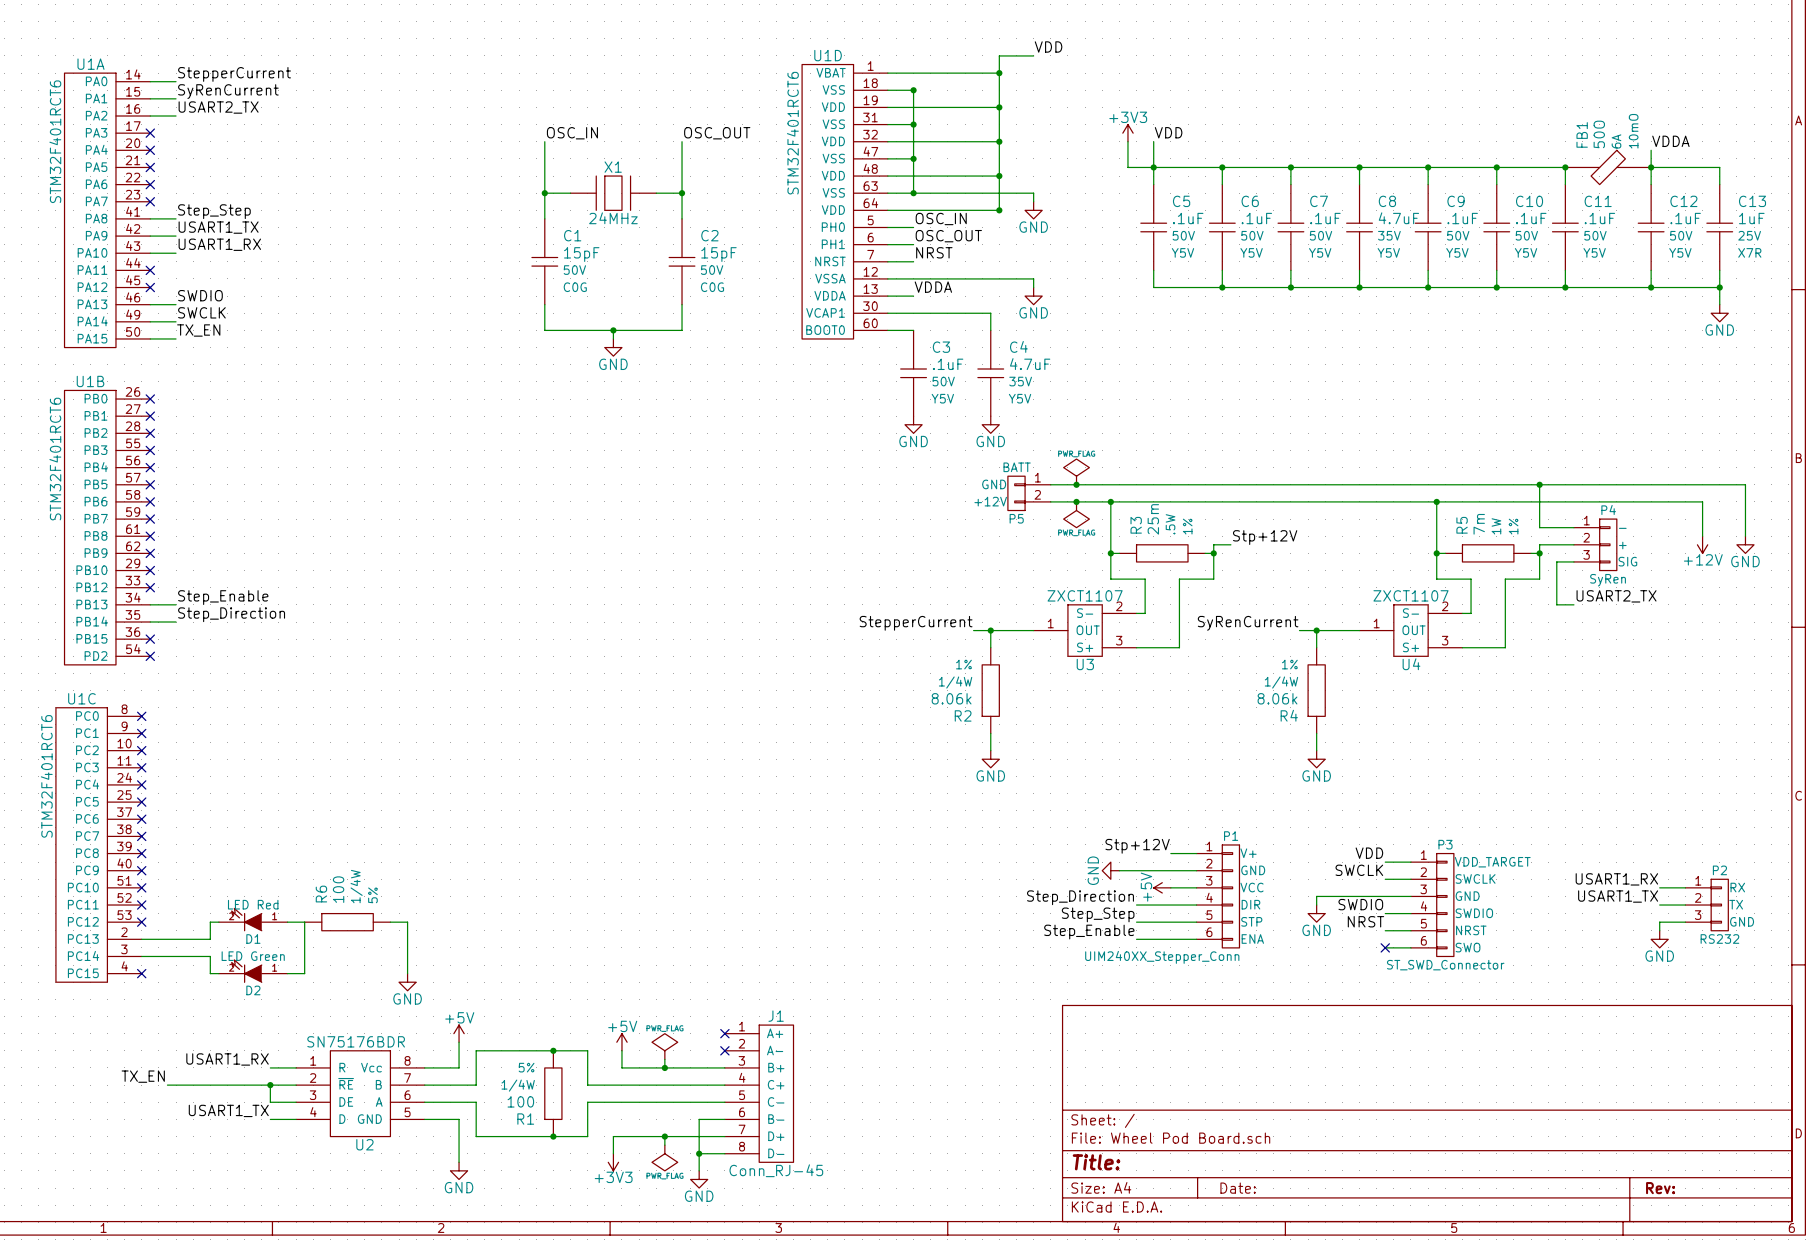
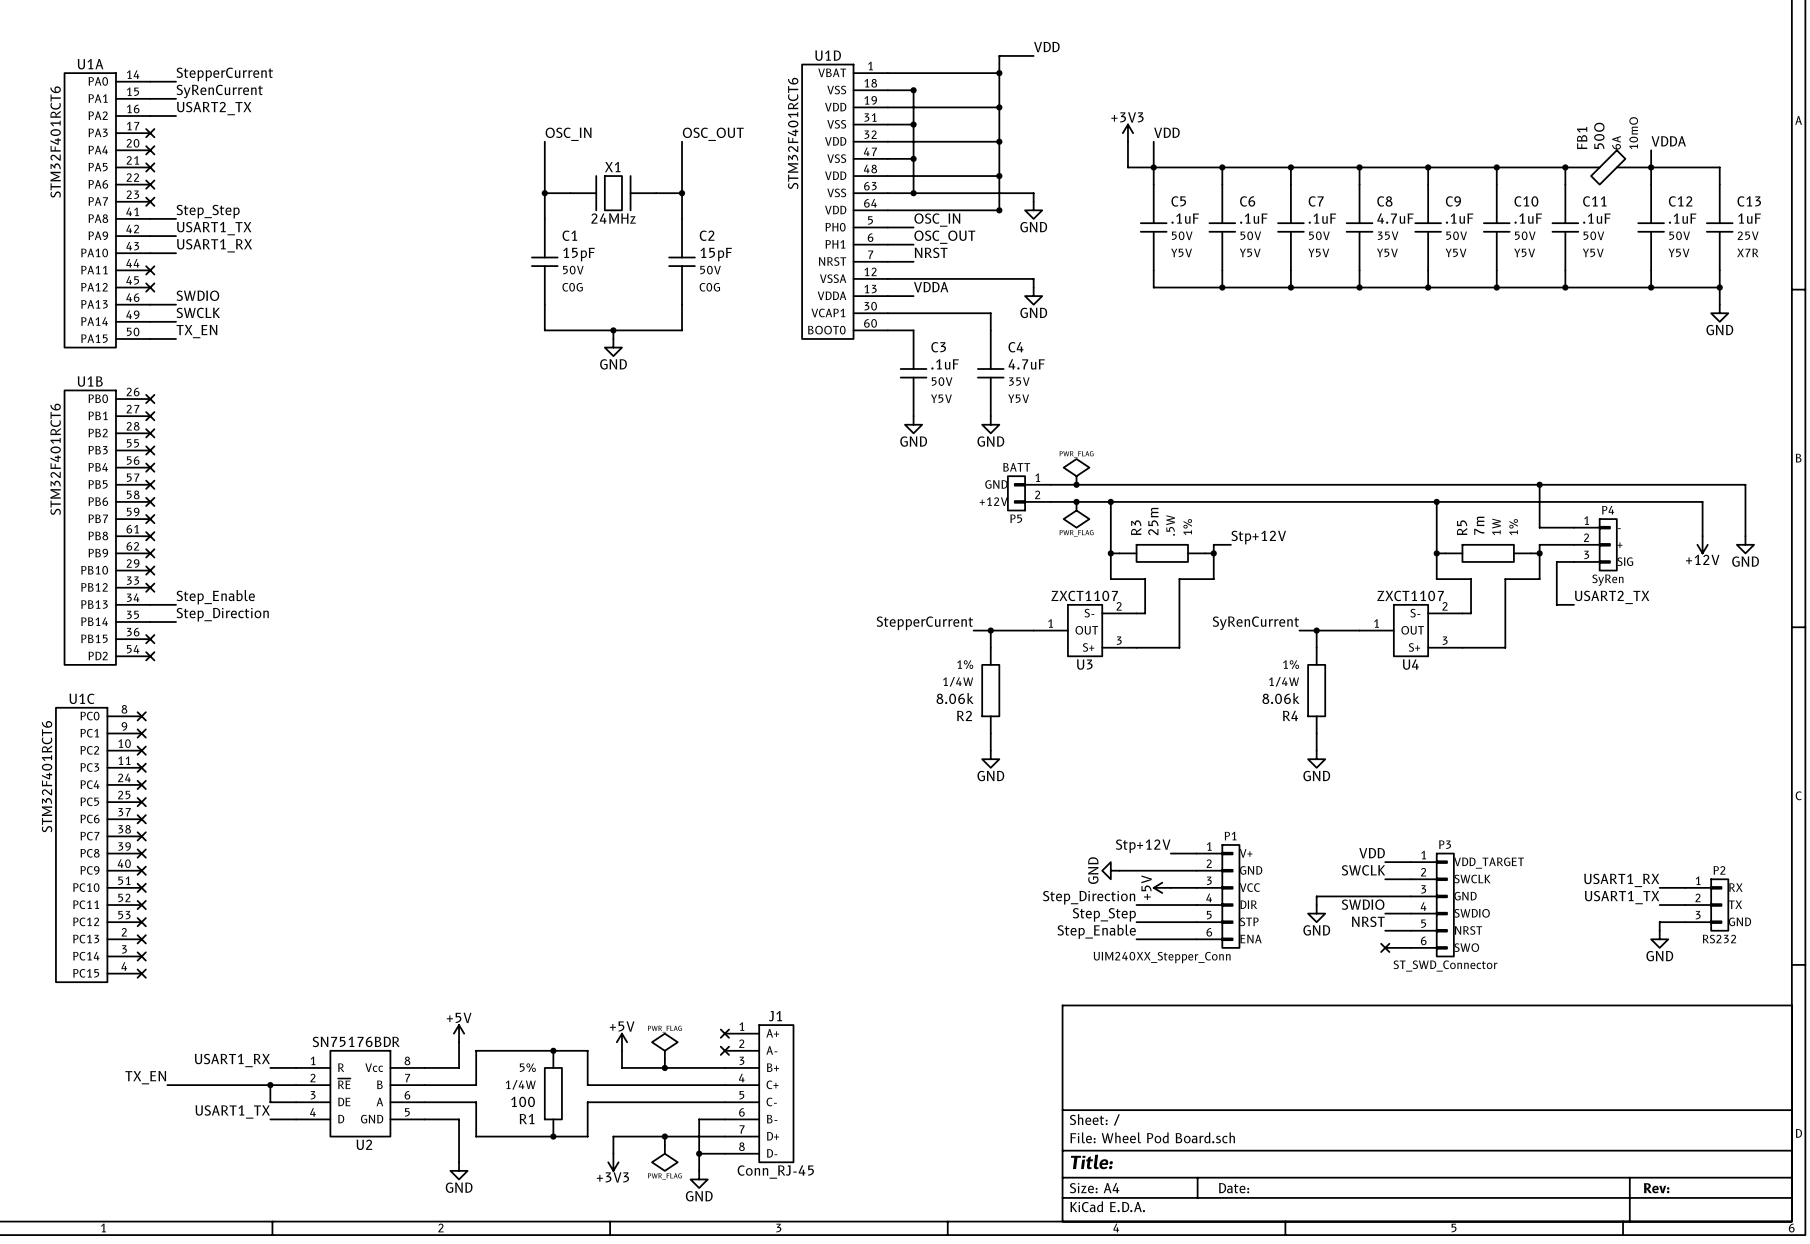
D1: LED Red (253, 919) -> none
wire: (218, 922) (210, 922) (210, 939) (141, 939) -> none
wire: (287, 922) (304, 922) (304, 973) (287, 973) -> none
R6: 100 (347, 922) -> none
wire: (390, 922) (407, 922) (407, 973) -> none
no-connect mark: none -> (141, 939)
wire: (141, 956) (210, 956) (210, 973) (218, 973) -> none
no-connect mark: none -> (141, 956)
D2: LED Green (253, 971) -> none
power symbol: GND (407, 982) -> none

